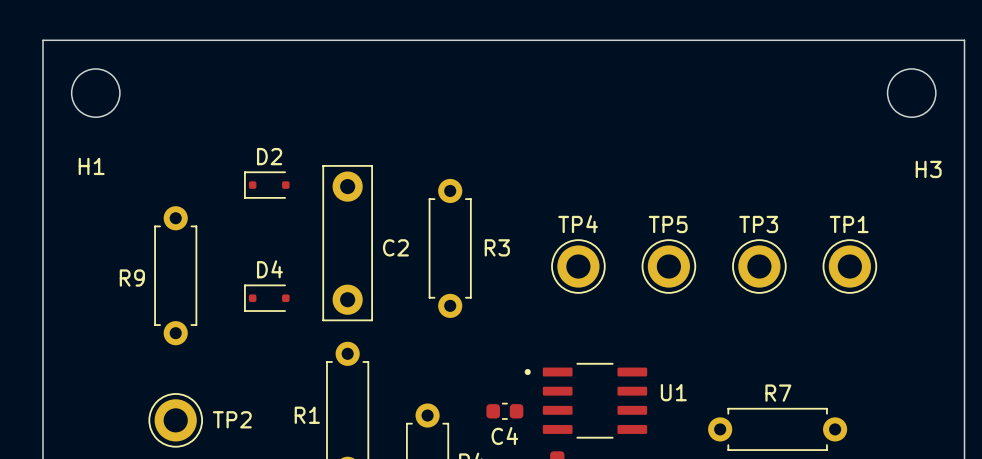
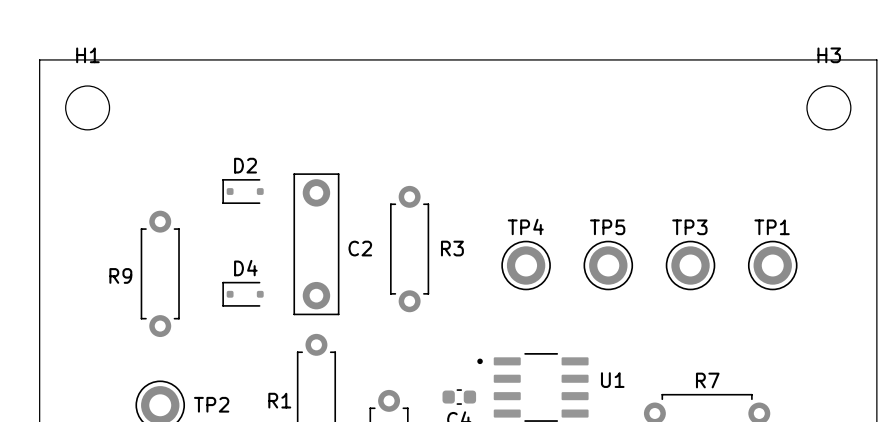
H1 name position: H1 (91, 166) -> H1 (87, 55)
H3 name position: H3 (928, 169) -> H3 (829, 55)

